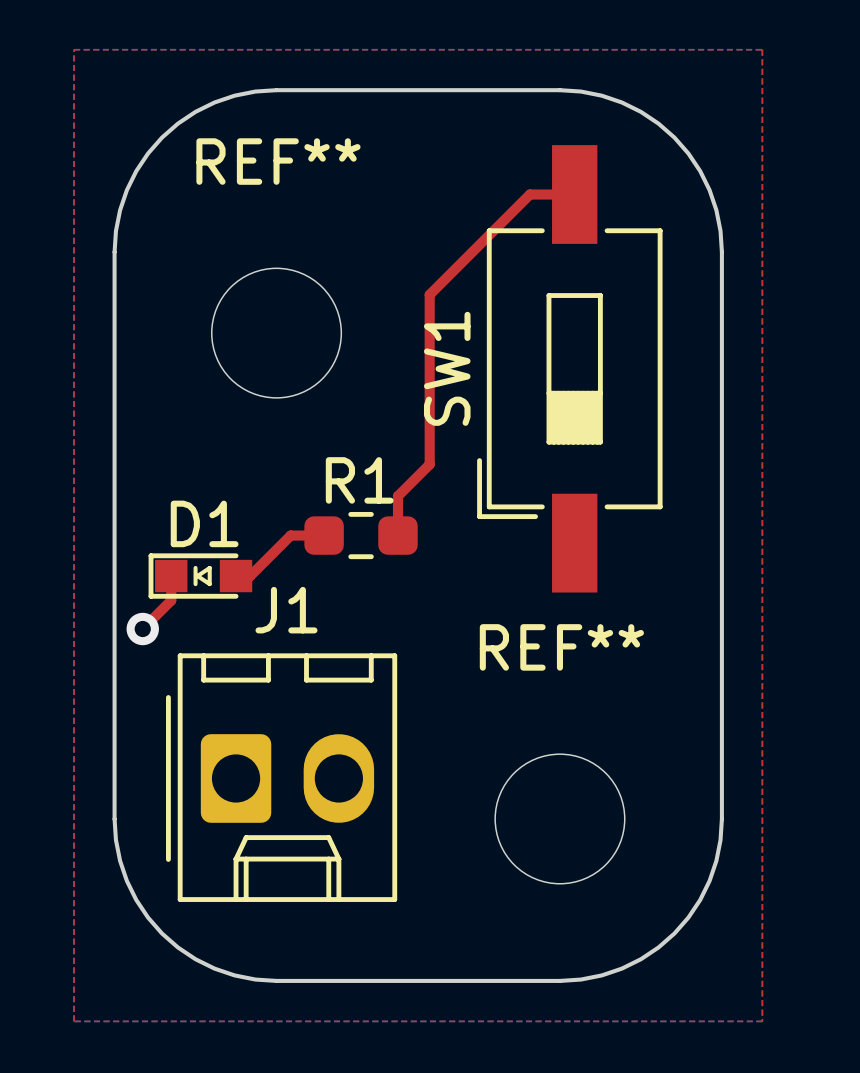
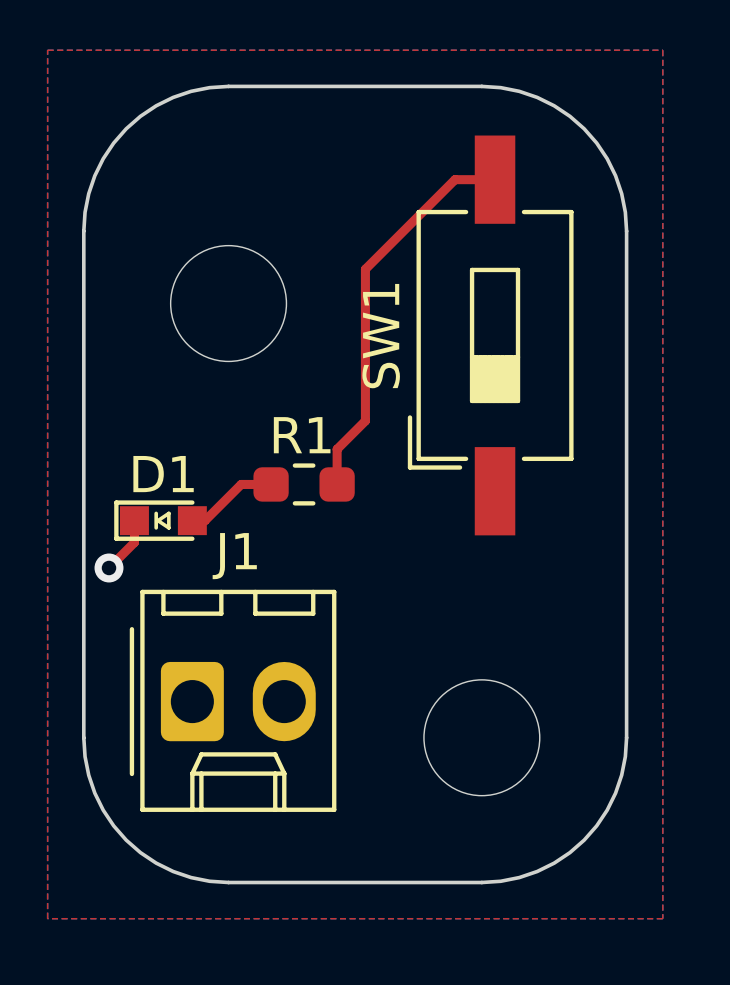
REF** name: REF** (278, 161) -> none
REF** name: REF** (561, 647) -> none

